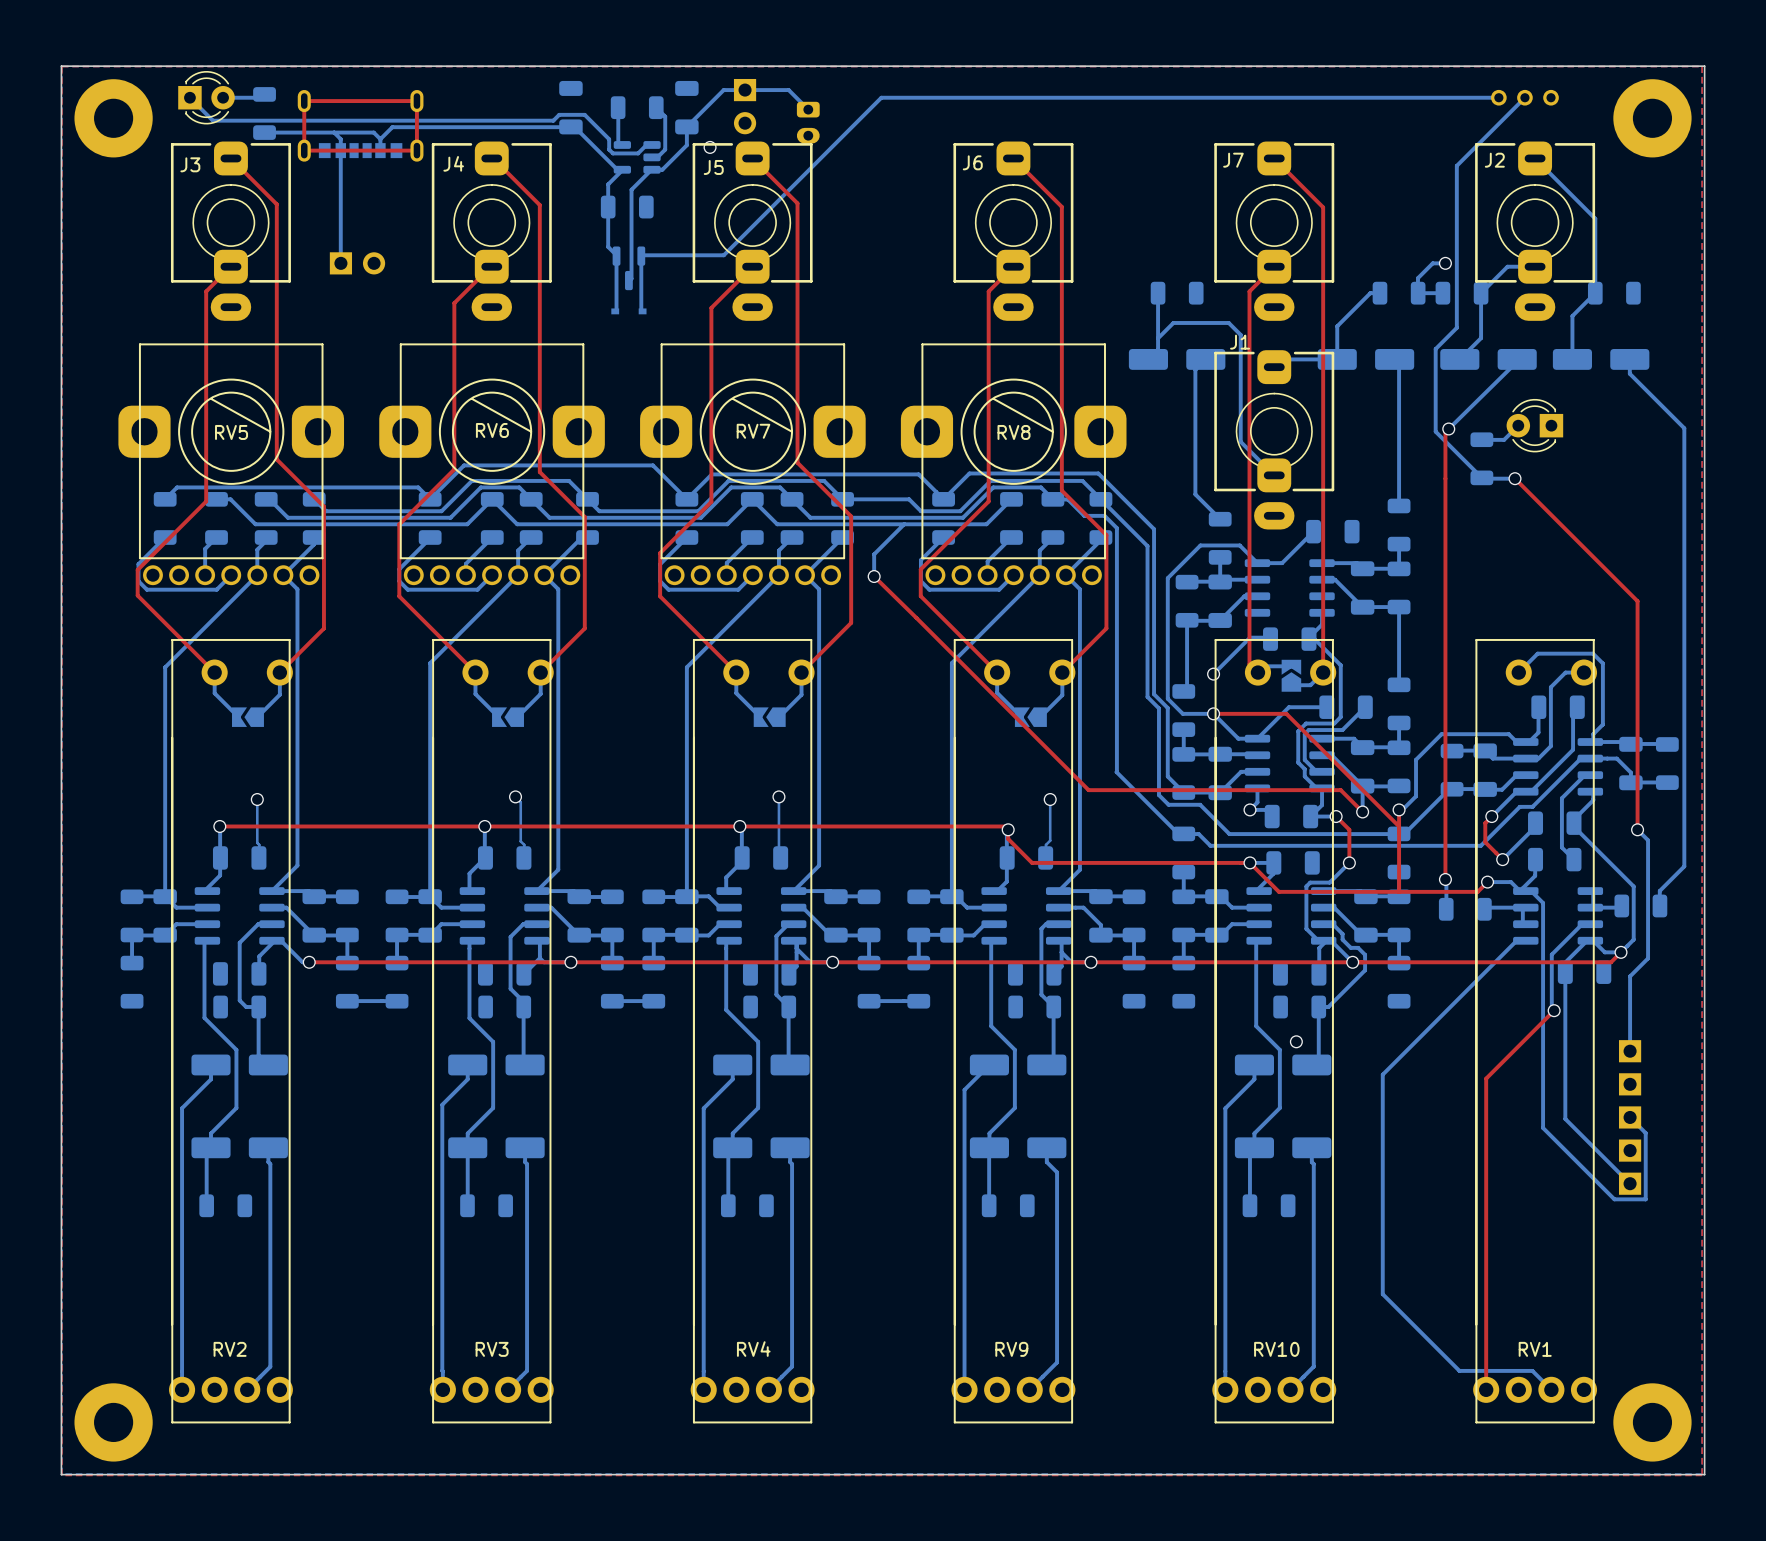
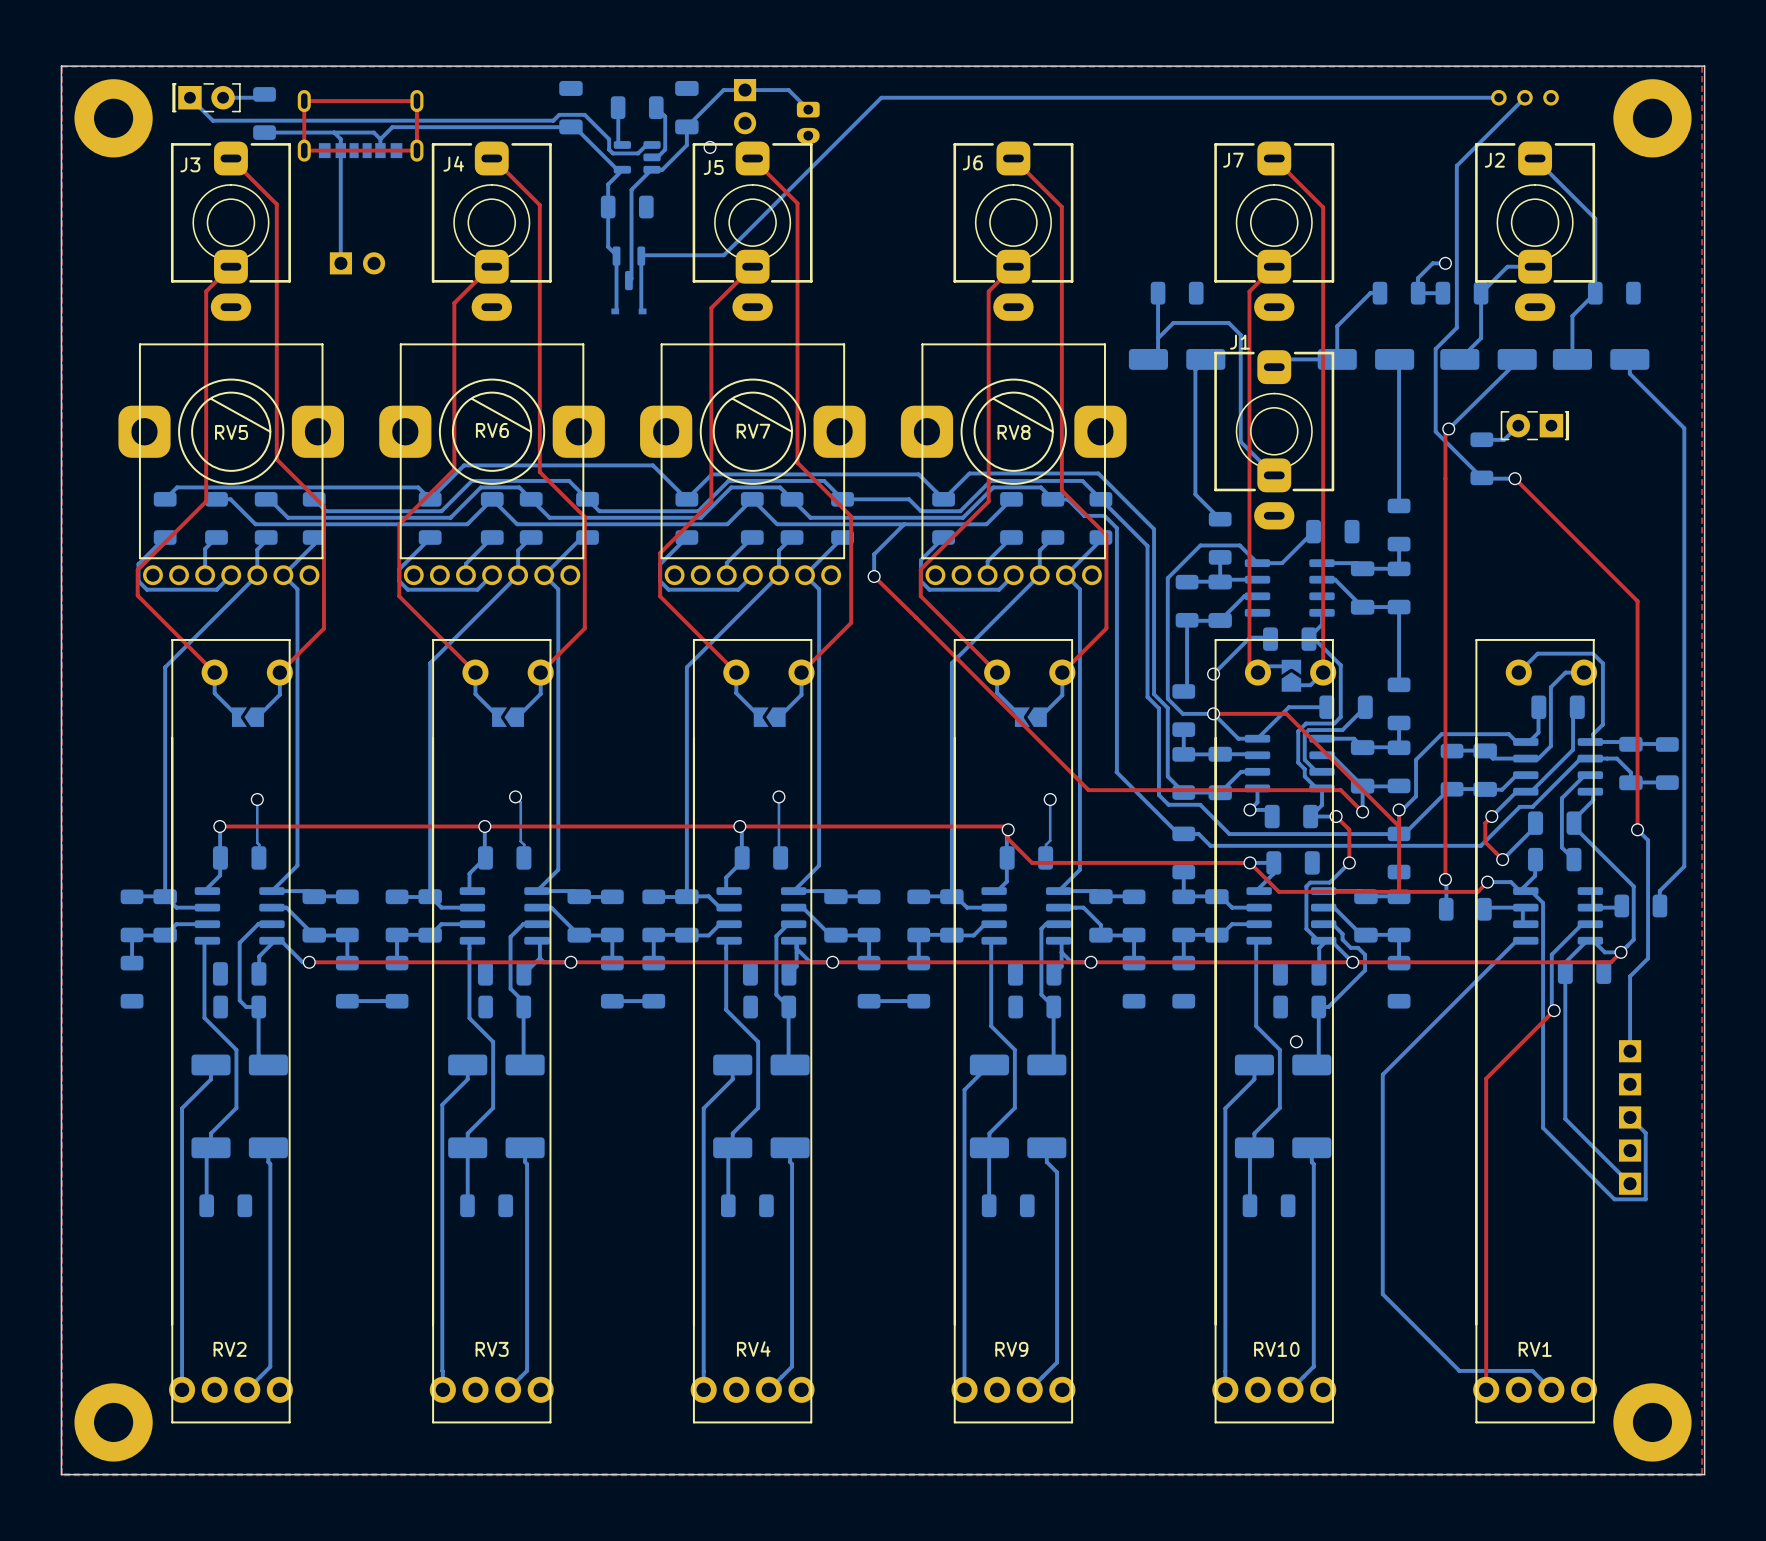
part footprint: [178, 71, 235, 125] -> [172, 83, 241, 113]
part footprint: [1506, 398, 1564, 453] -> [1500, 411, 1570, 441]

